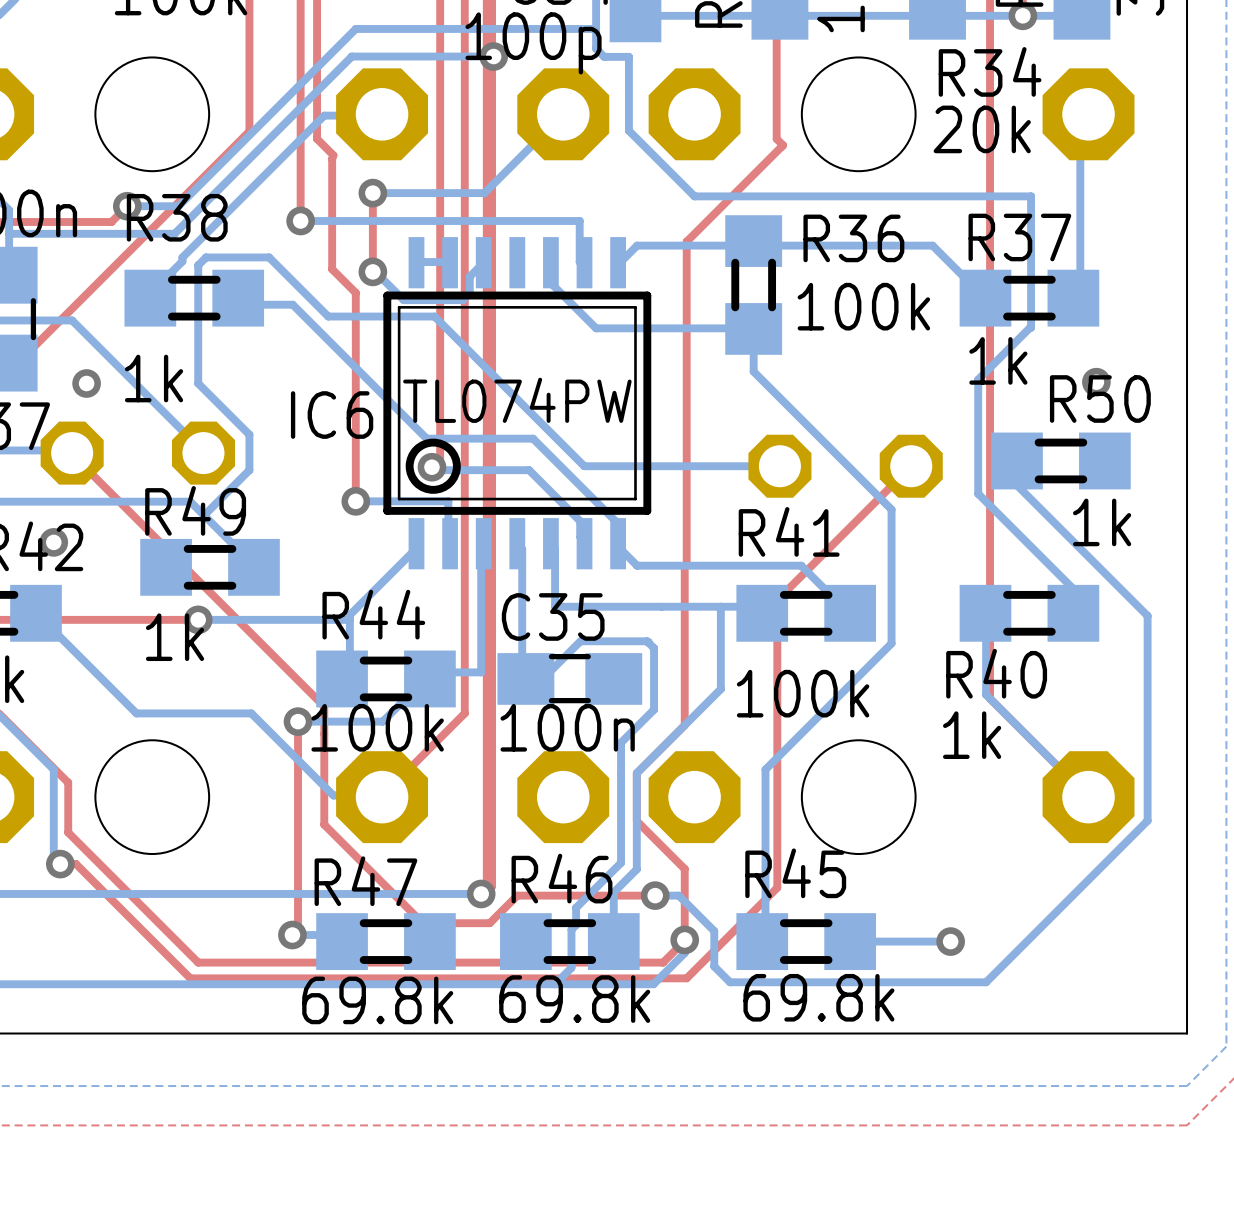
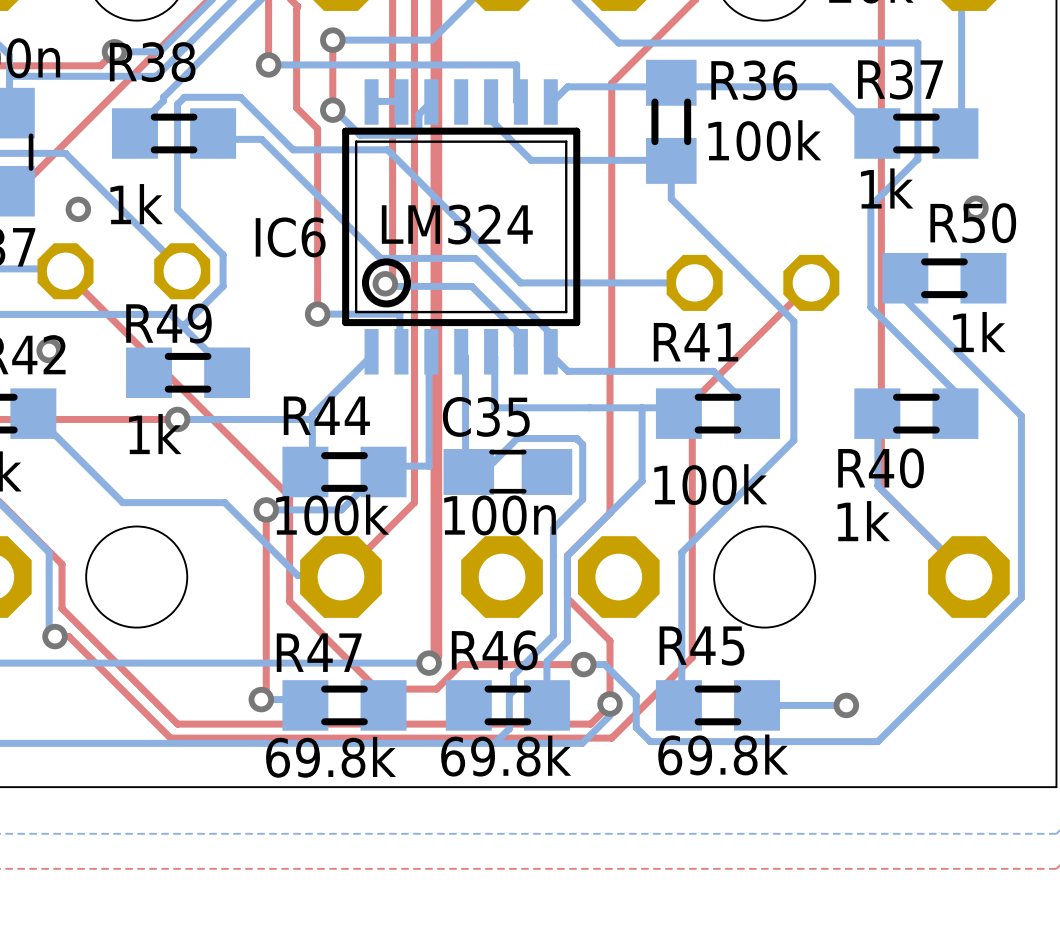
IC6 value: TL074PW (517, 400) -> LM324 (457, 224)

